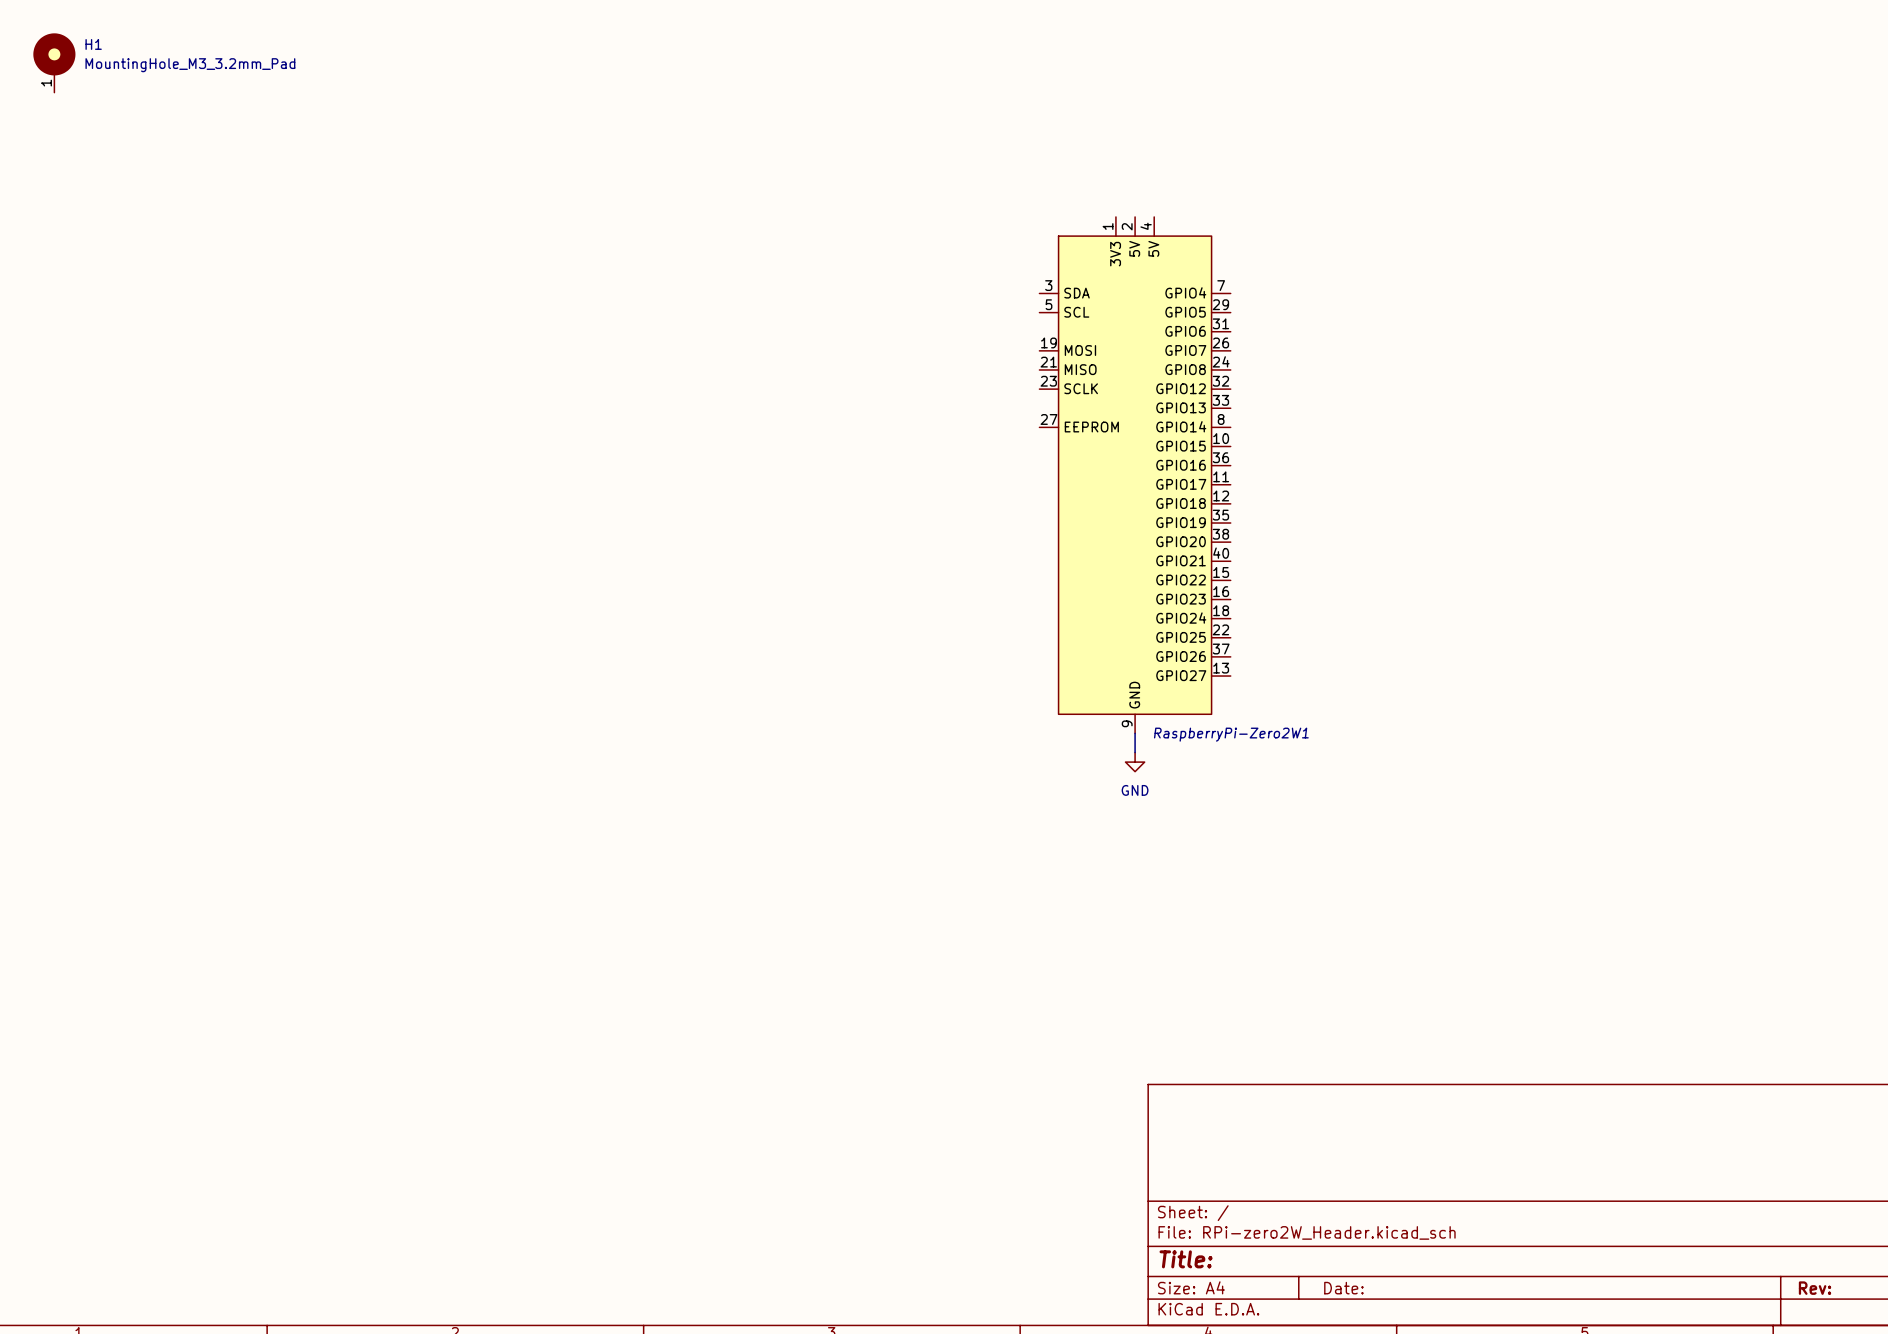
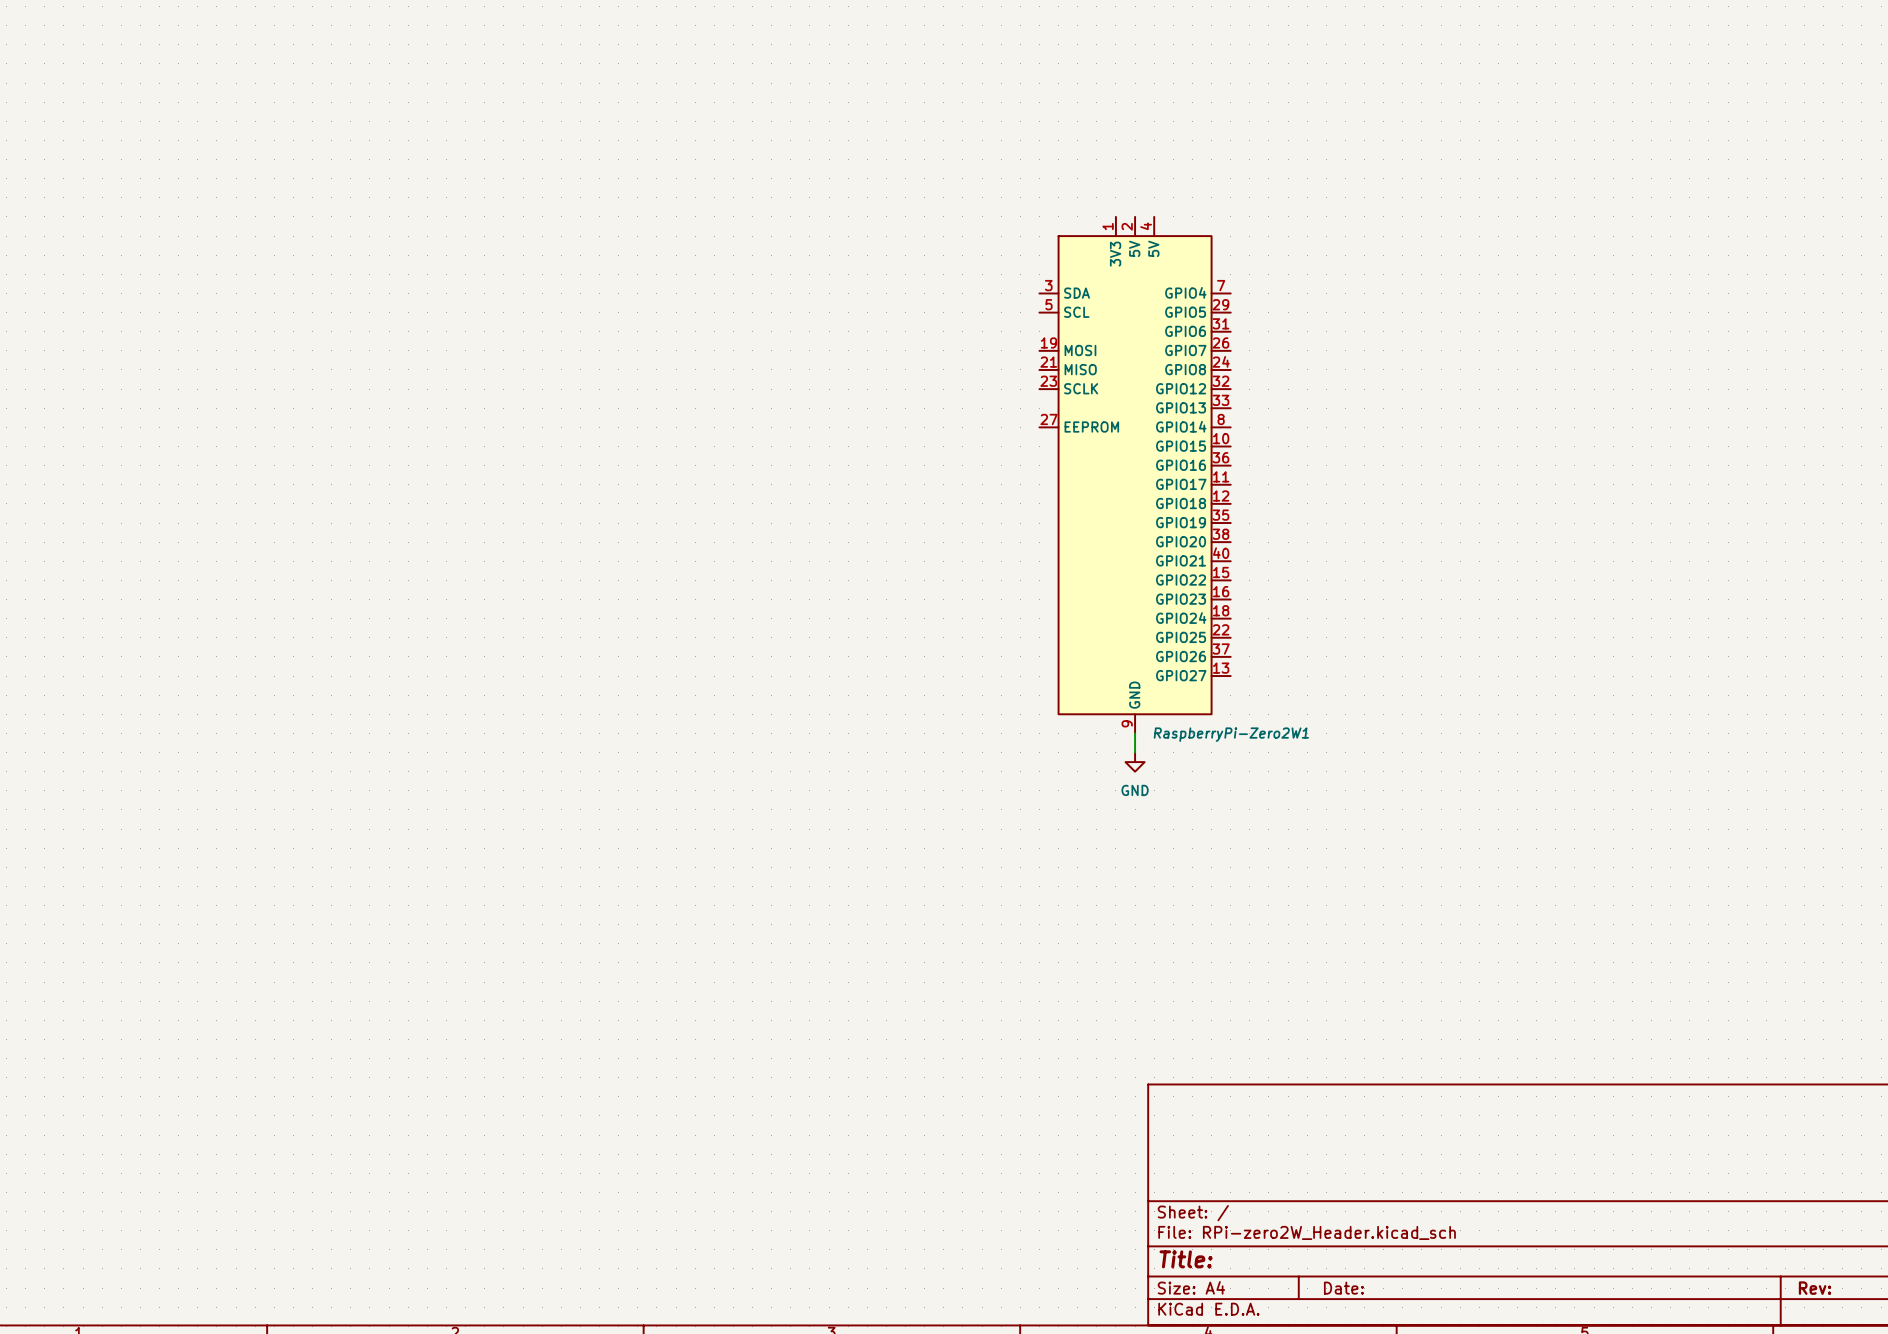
H1: MountingHole_M3_3.2mm_Pad (54, 62) -> none

